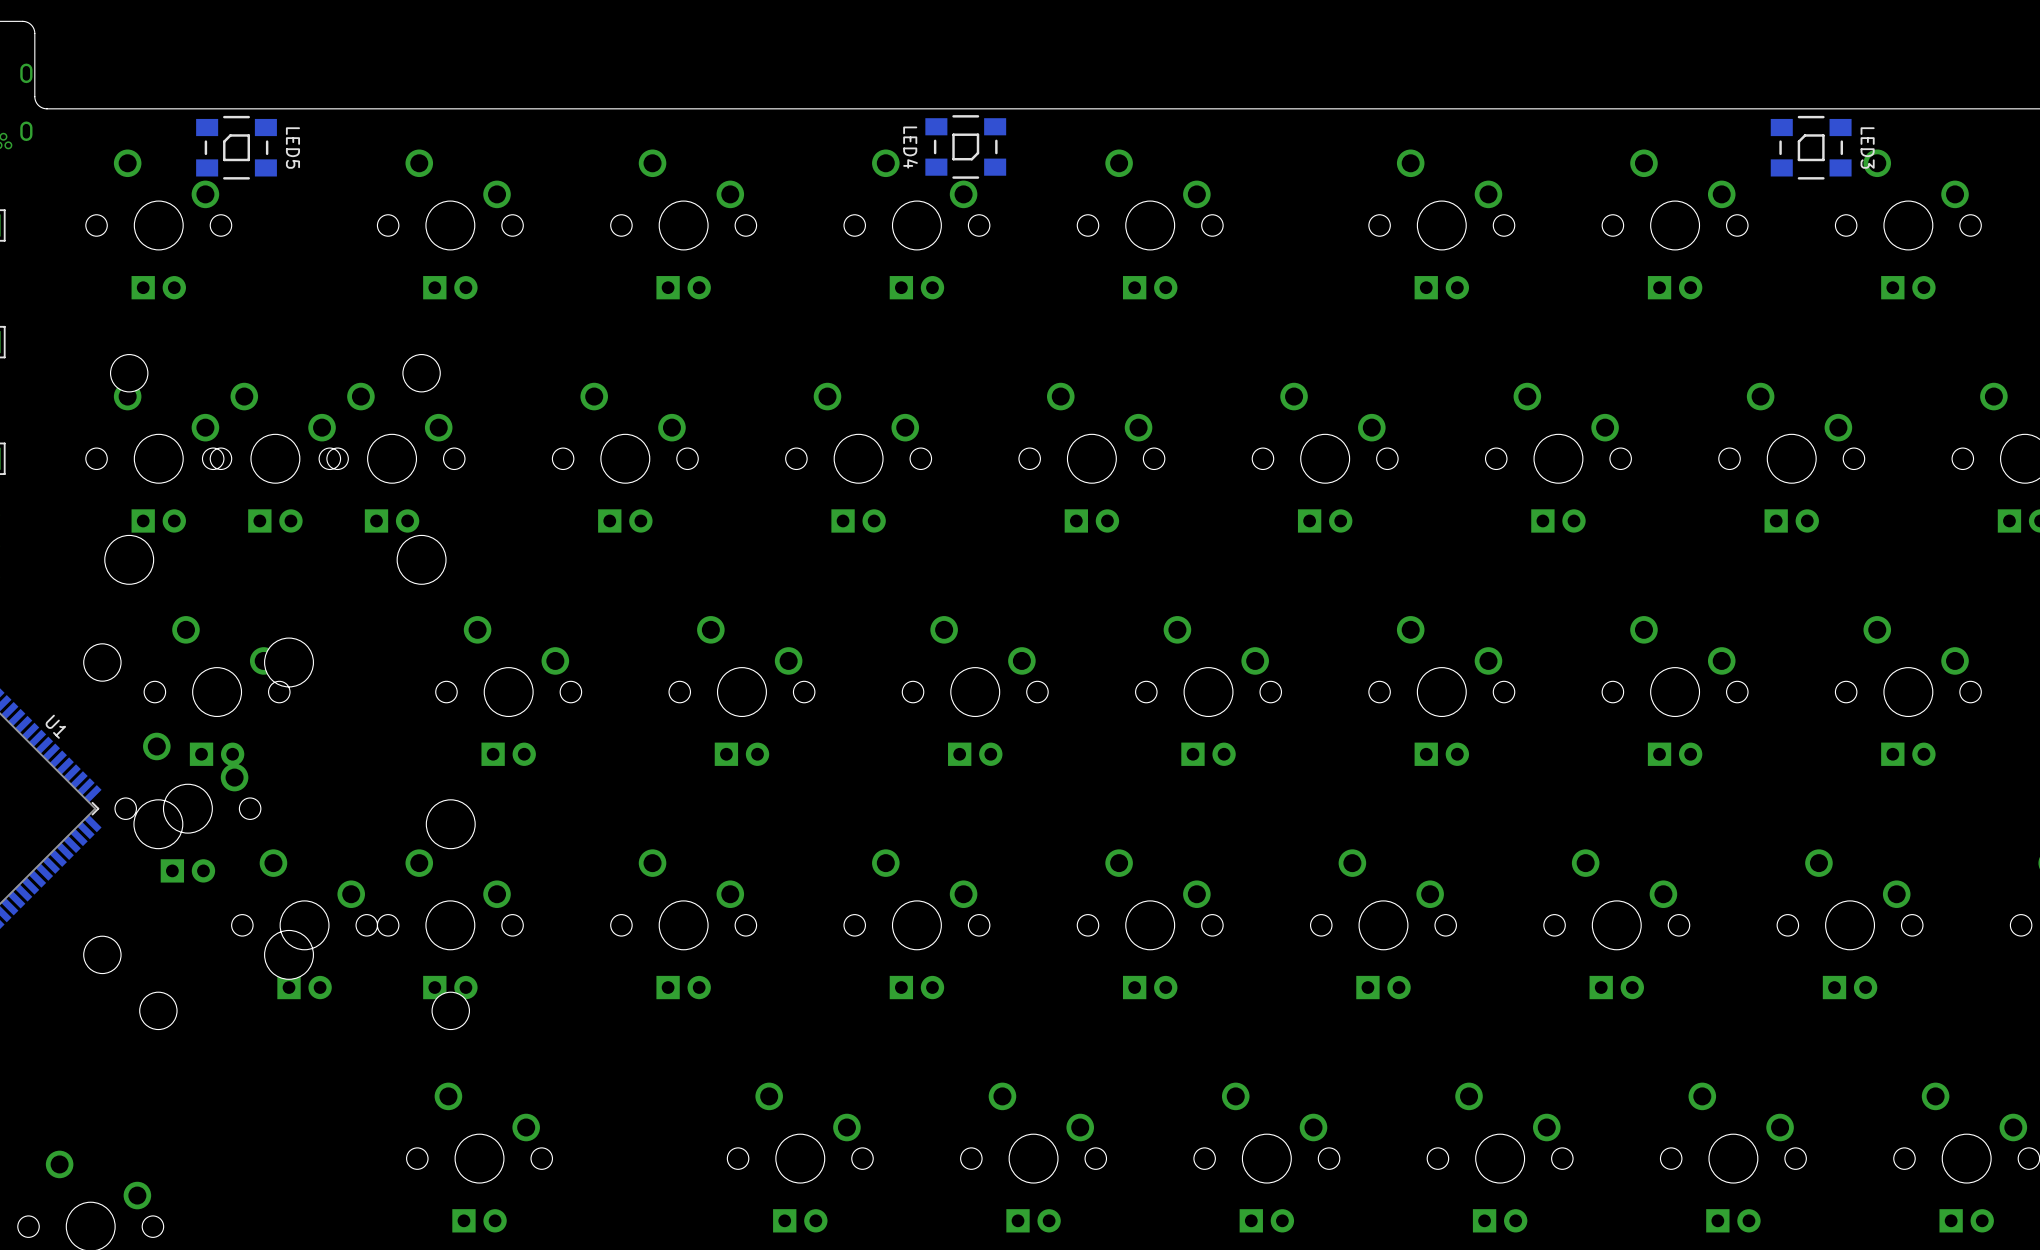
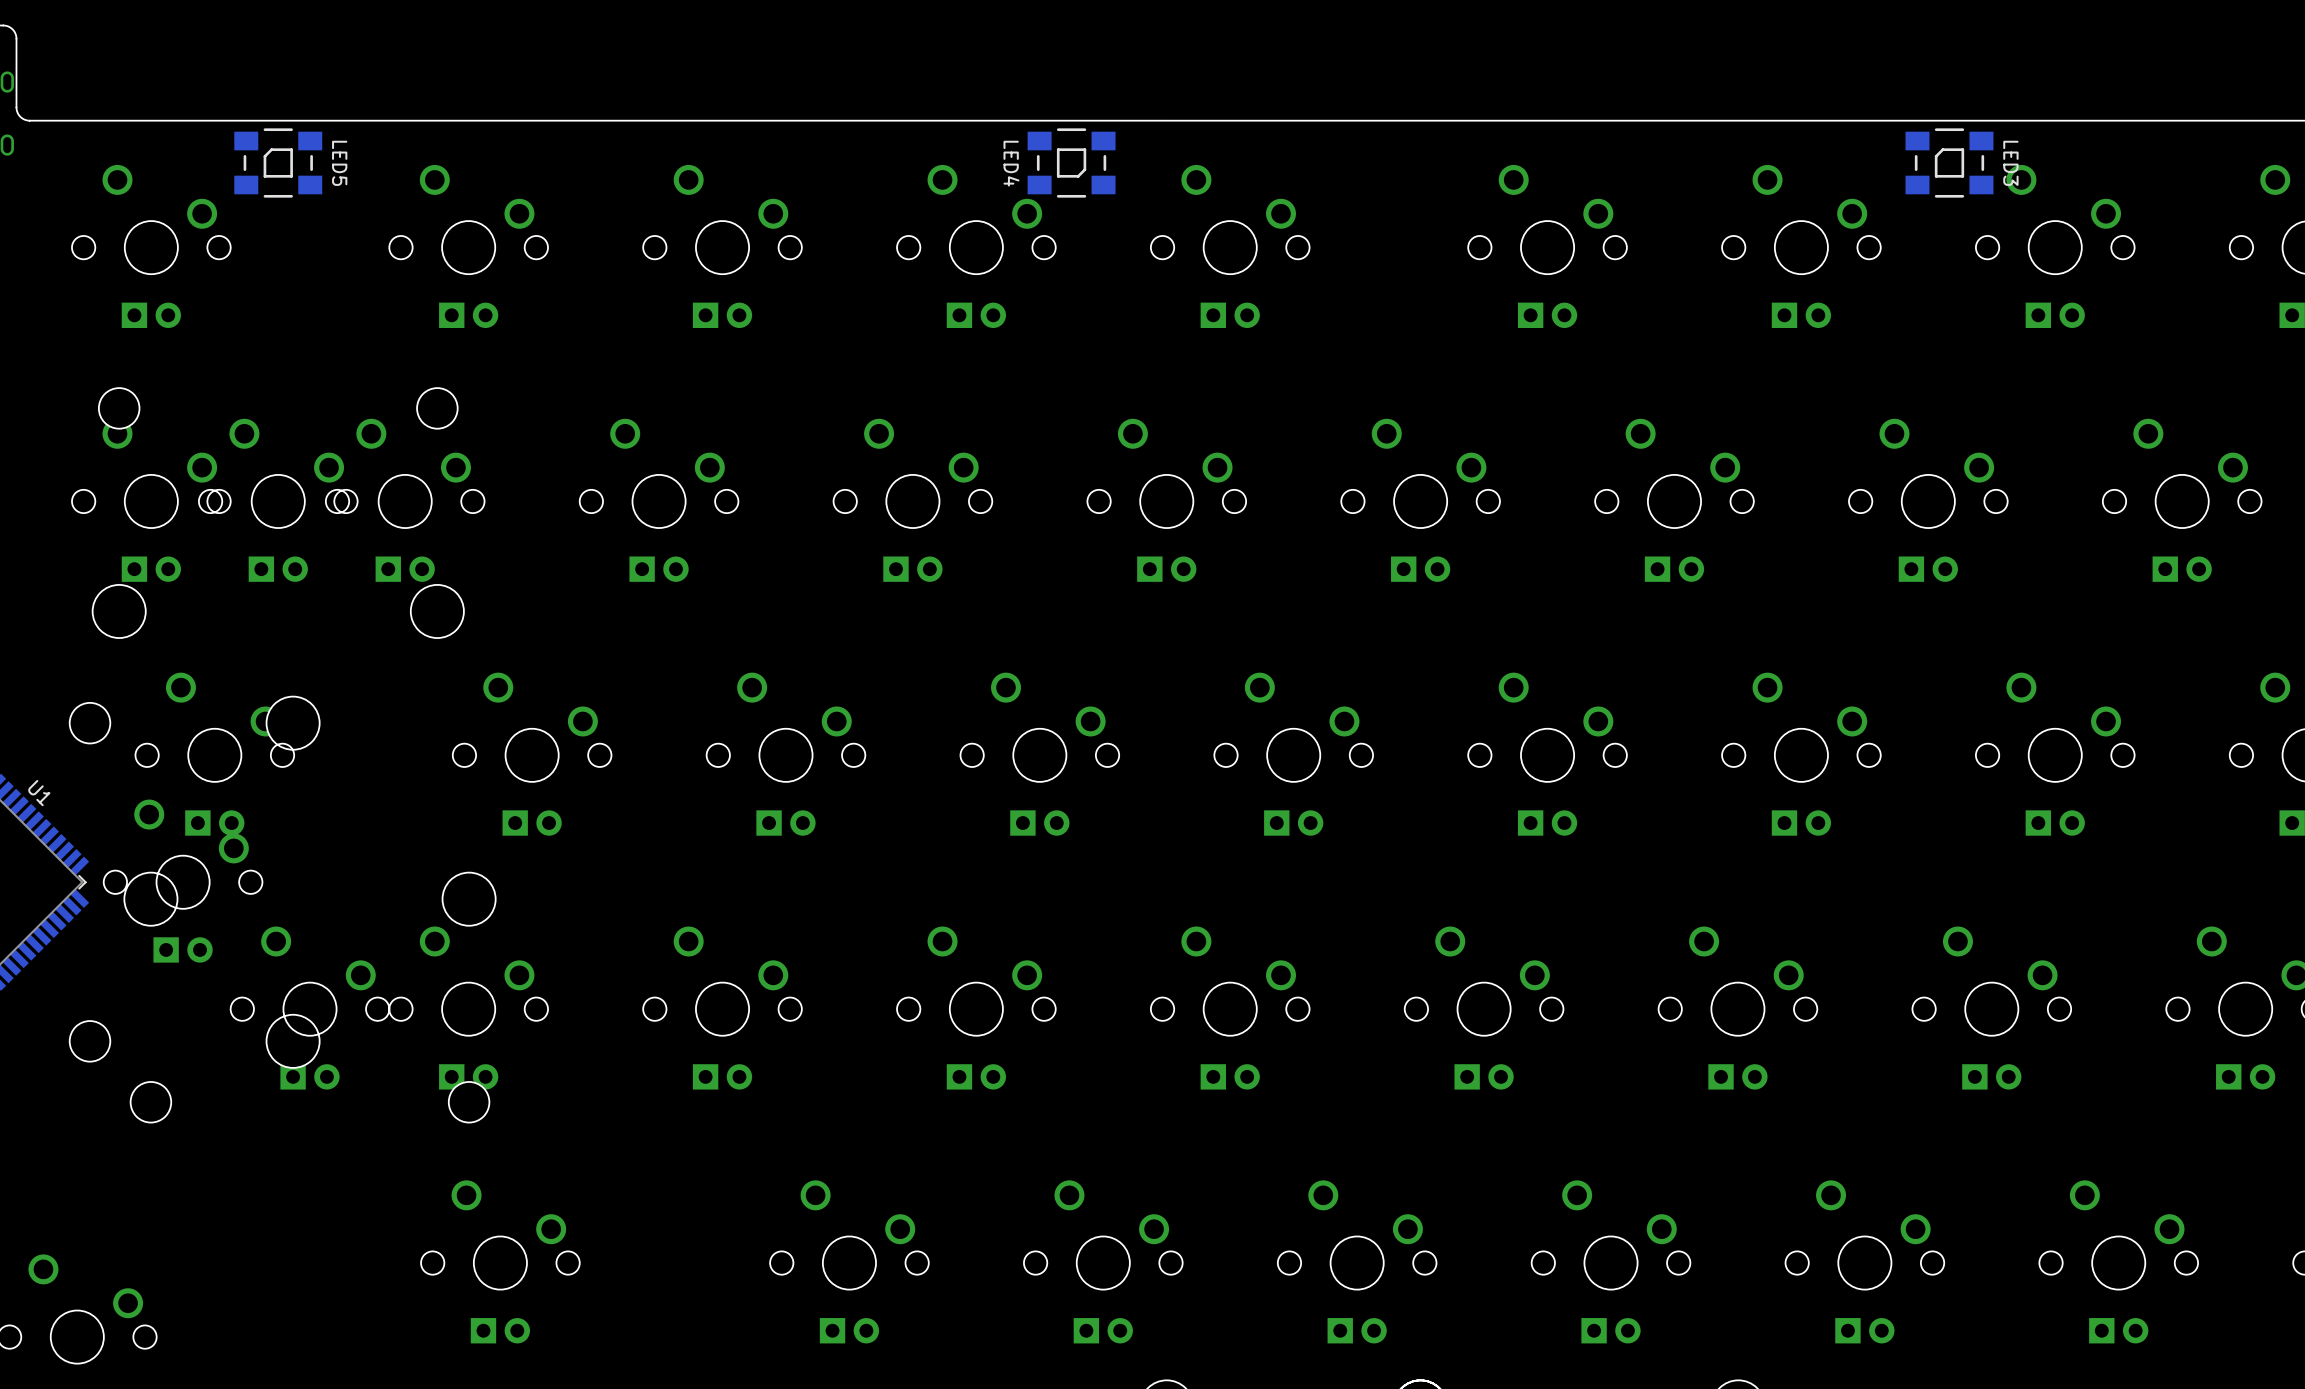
LED4 position: (965, 146) -> (1071, 163)
LED5 position: (236, 147) -> (278, 163)

